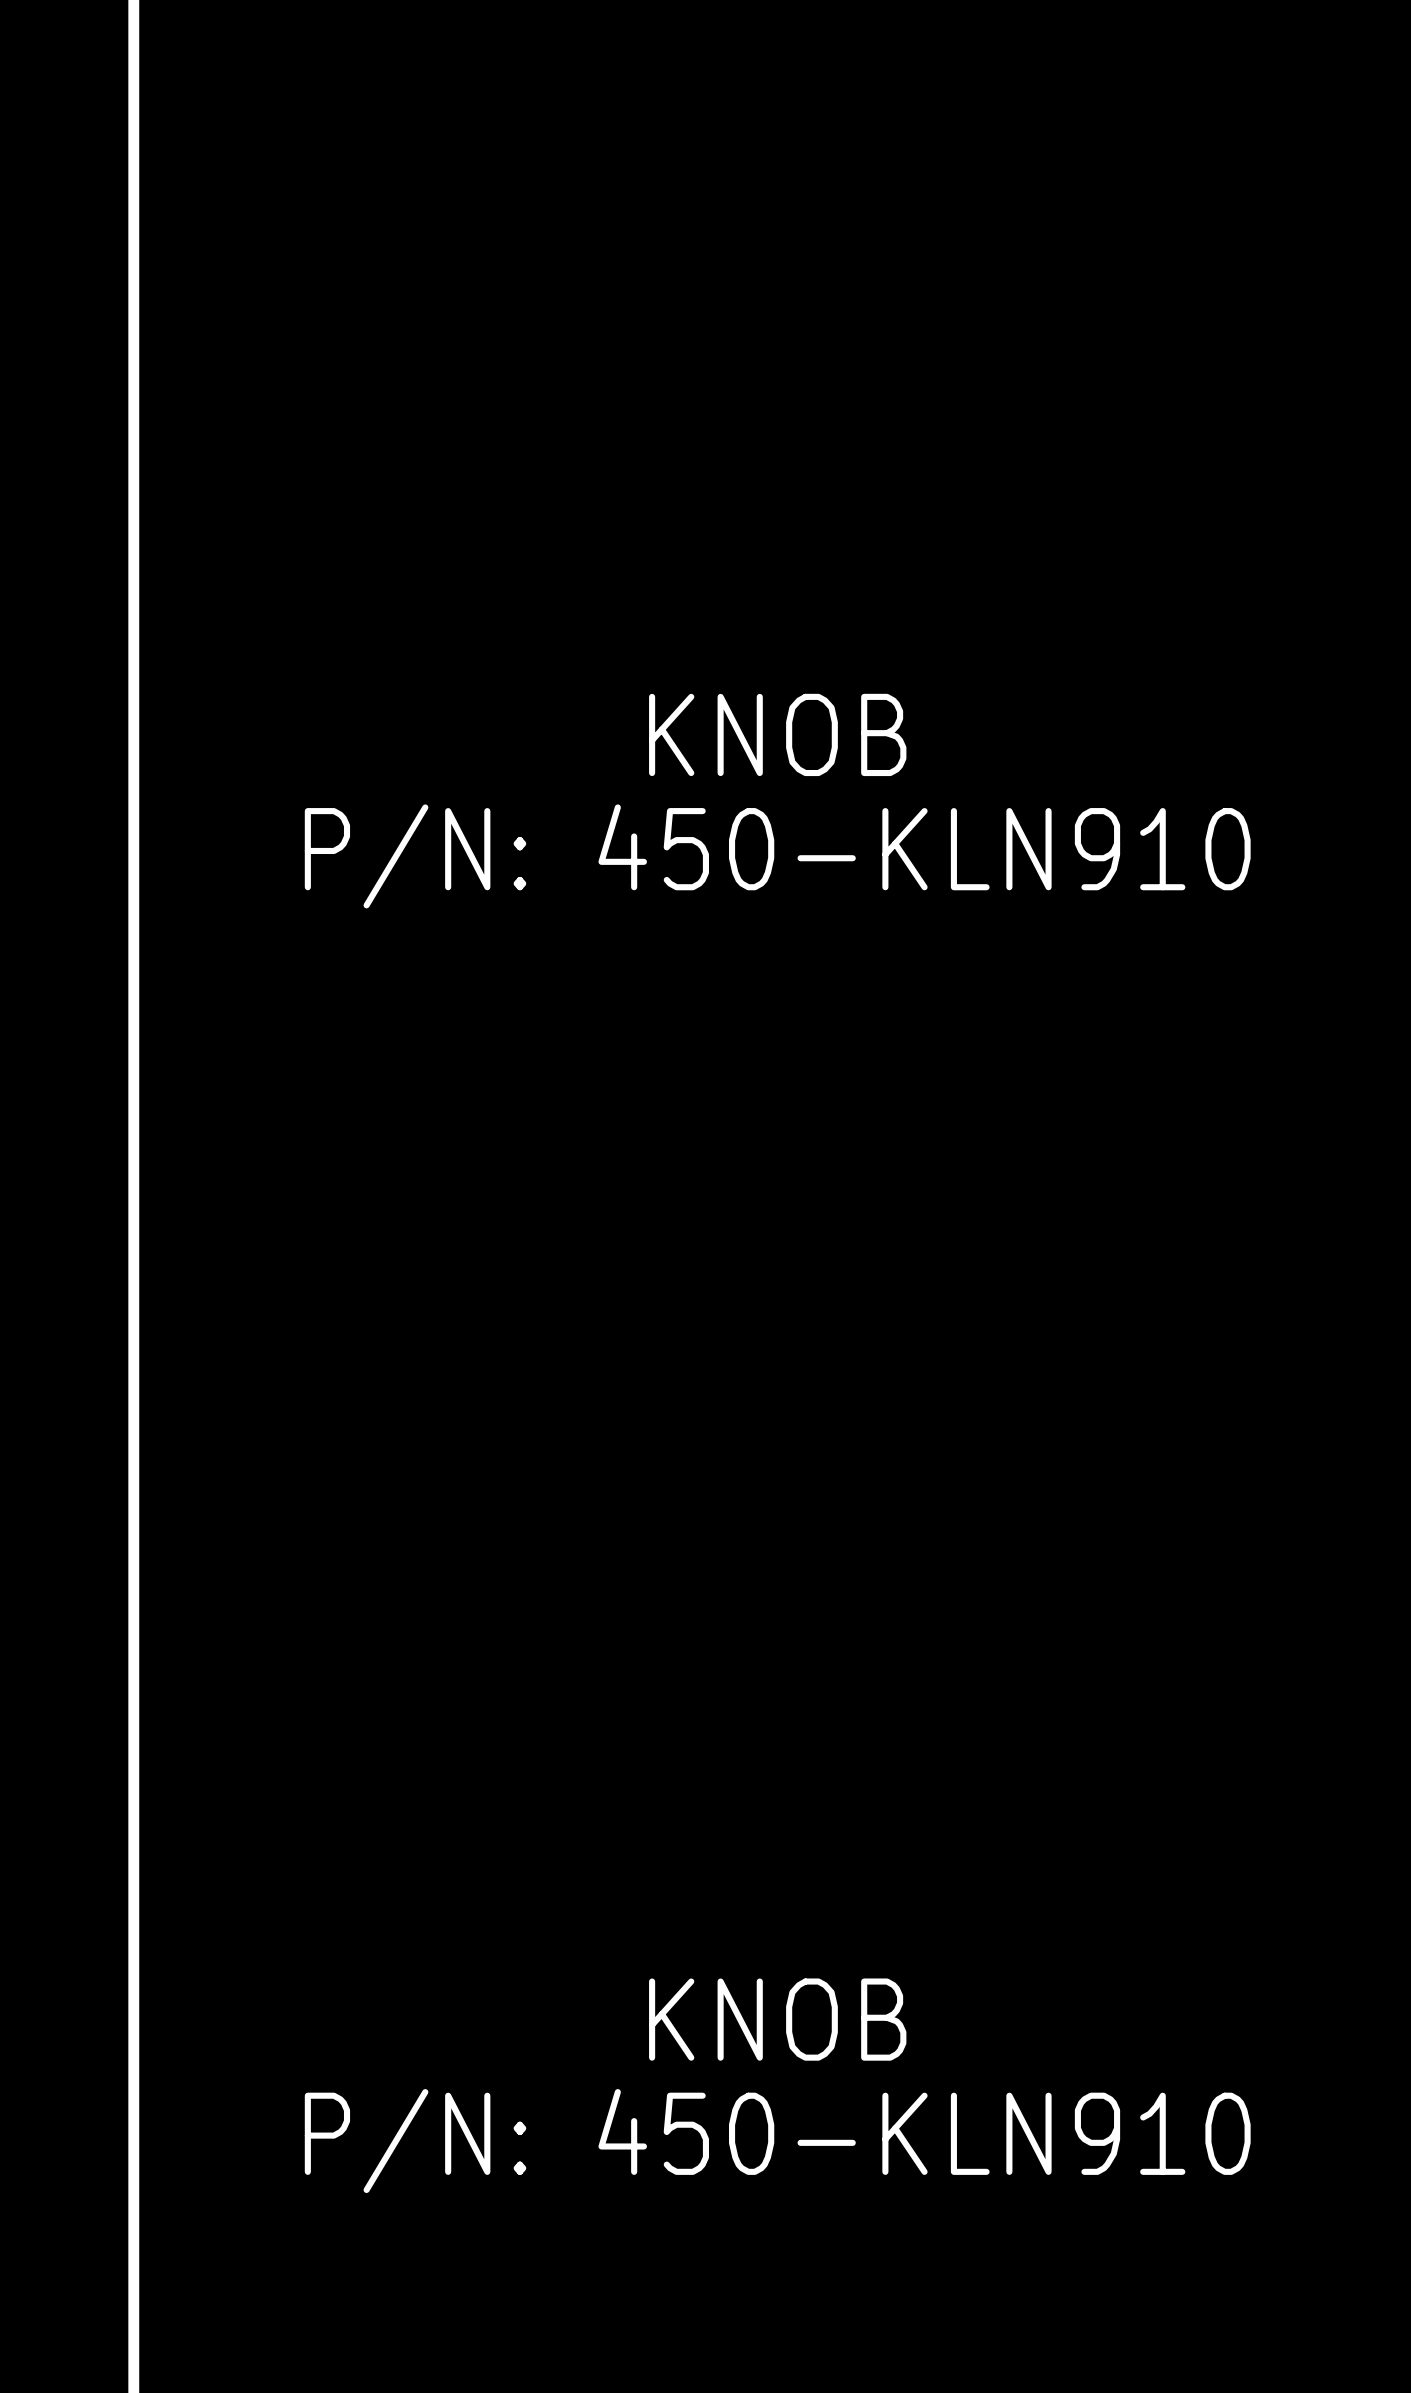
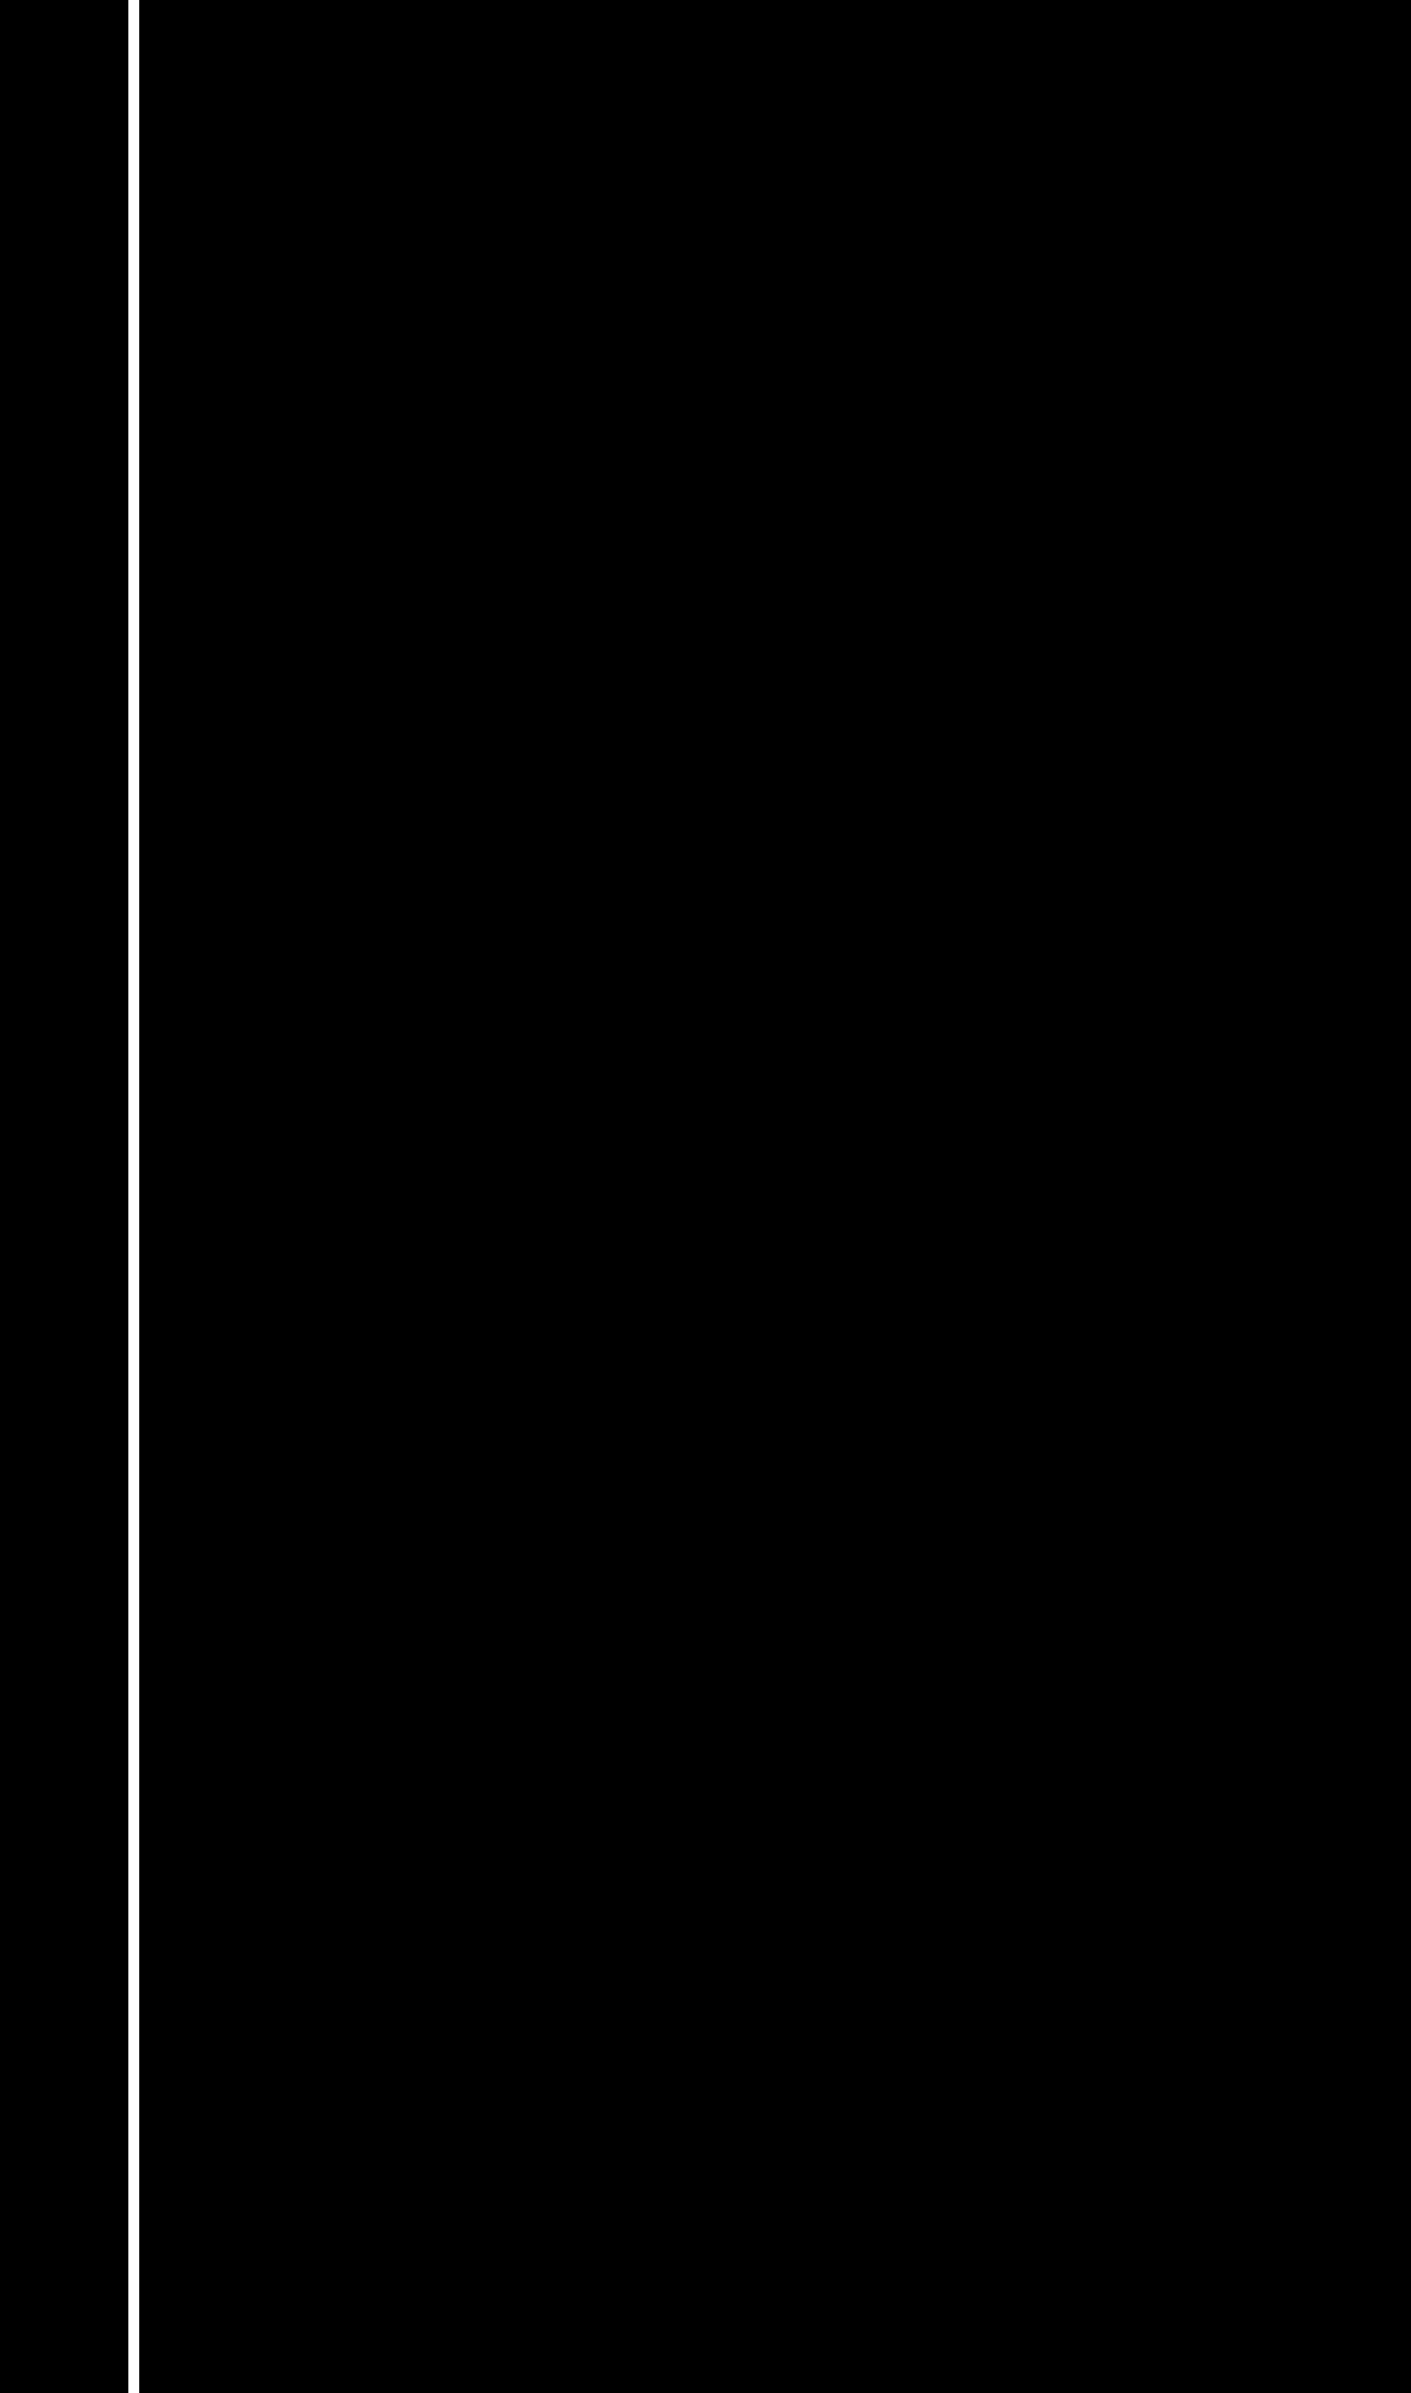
text: KNOB (777, 734) -> none
text: P/N: 450-KLN910 (777, 856) -> none
text: KNOB (777, 2019) -> none
text: P/N: 450-KLN910 (777, 2141) -> none

